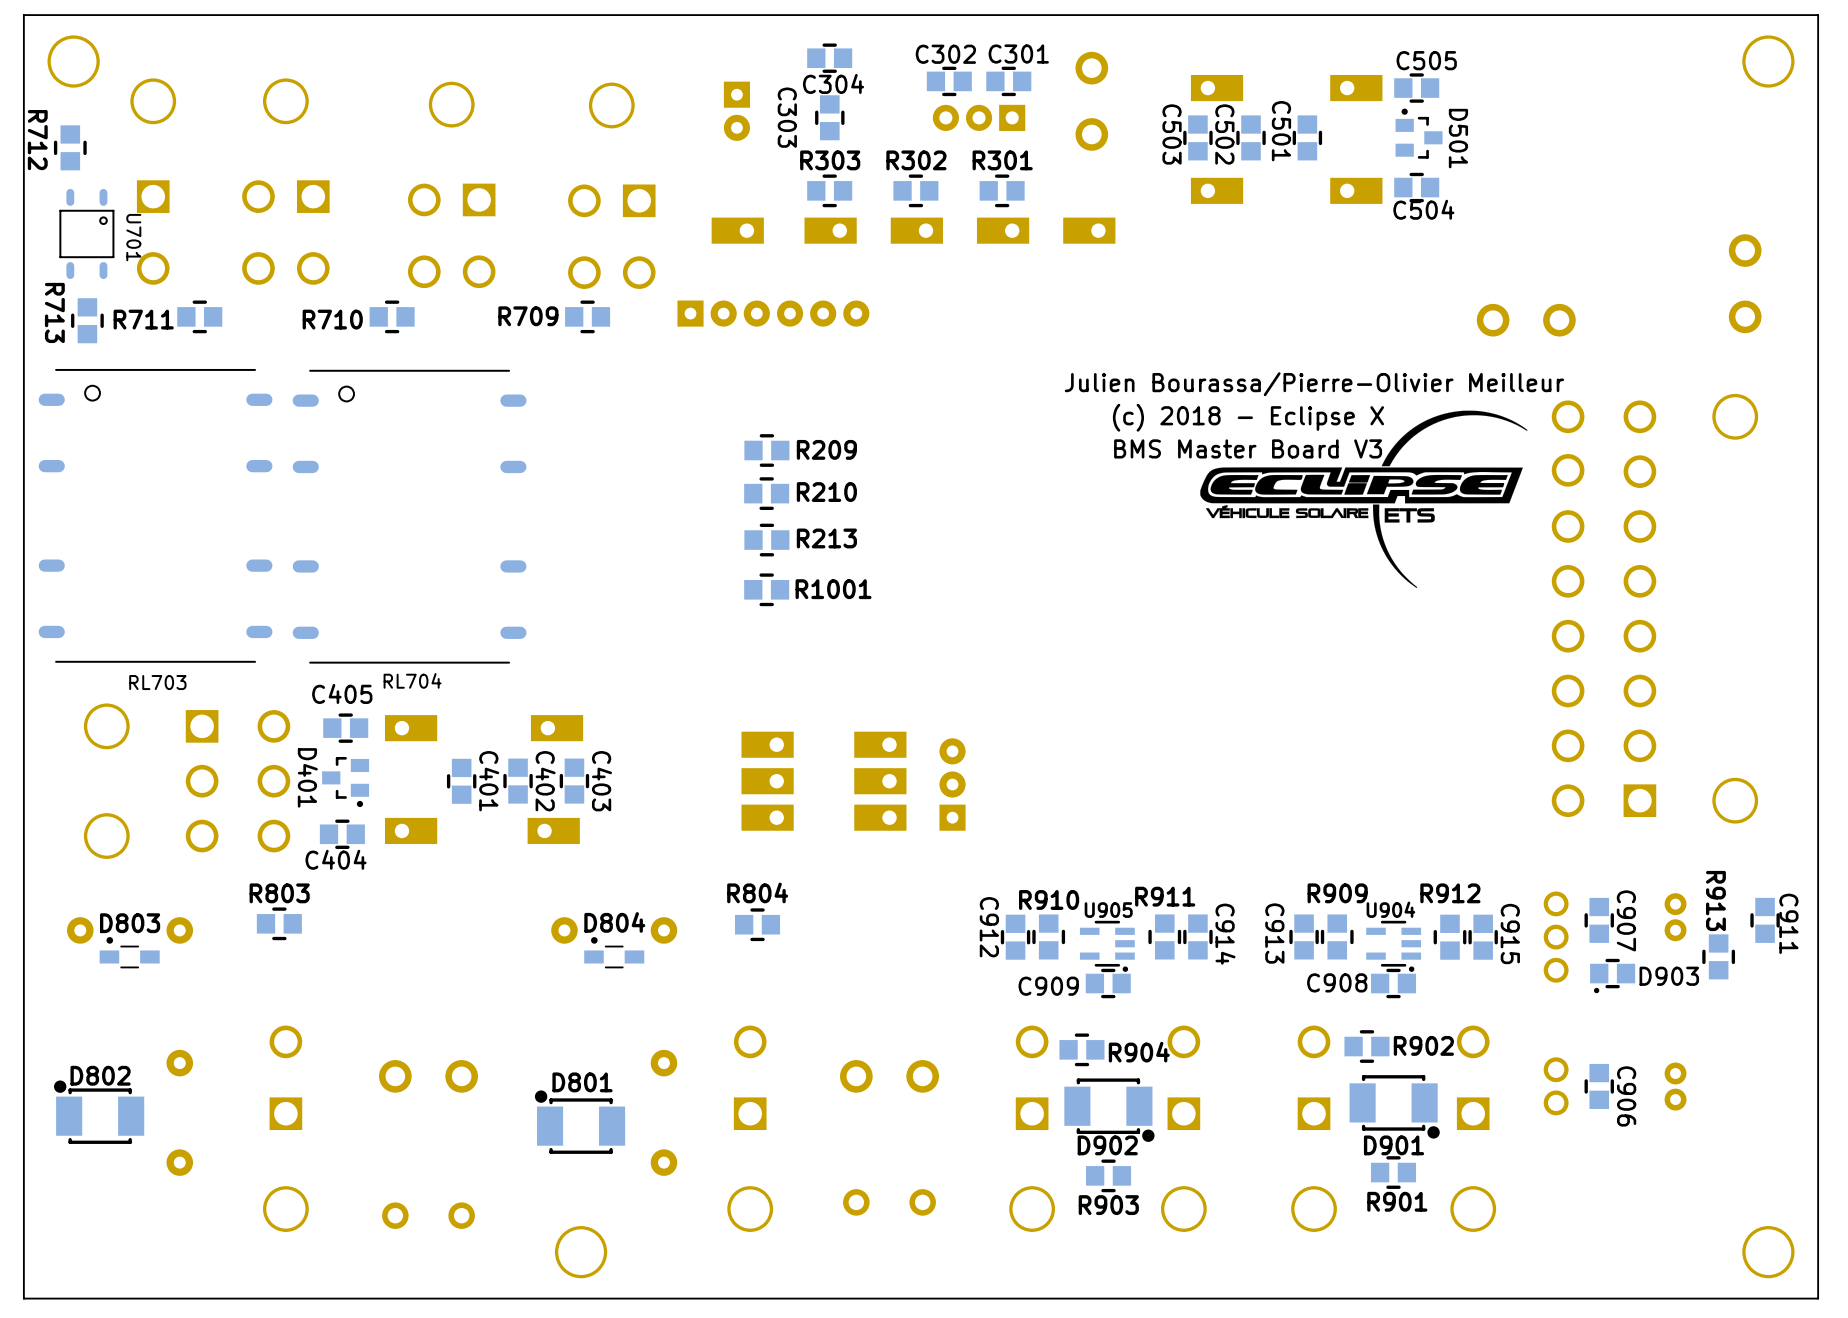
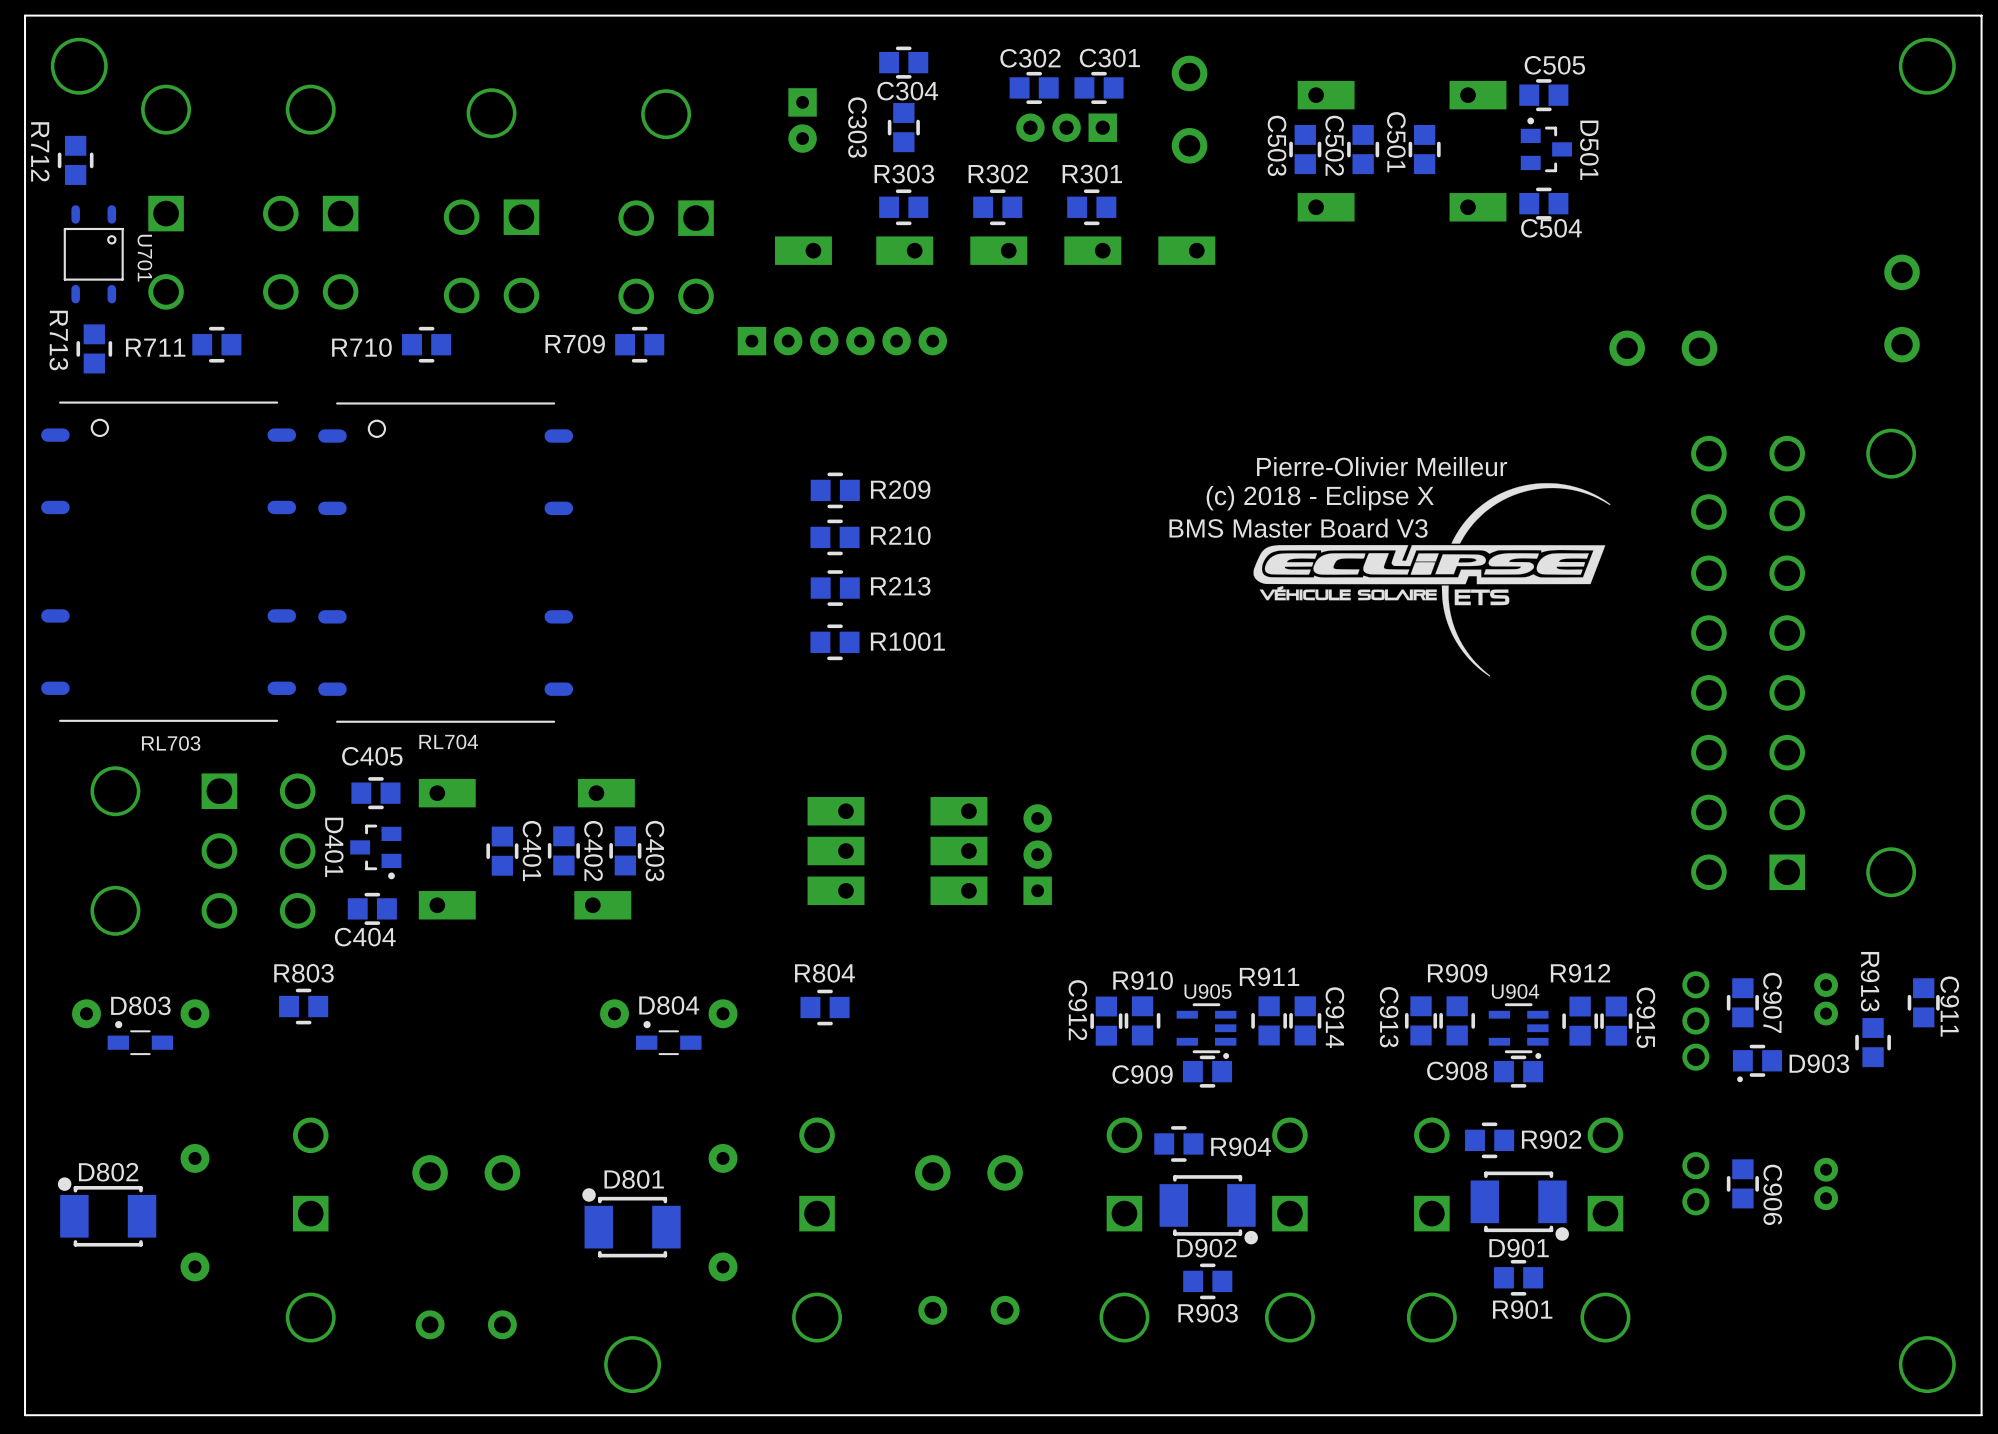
text: Julien Bourassa/Pierre-Olivier Meilleur (1314, 384) -> none
text position: (c) 2018 - Eclipse X (1248, 417) -> (c) 2018 - Eclipse X (1320, 498)
text: none -> Pierre-Olivier Meilleur (1382, 466)
text position: BMS Master Board V3 (1248, 448) -> BMS Master Board V3 (1298, 528)
drawing position: (1363, 499) -> (1431, 579)

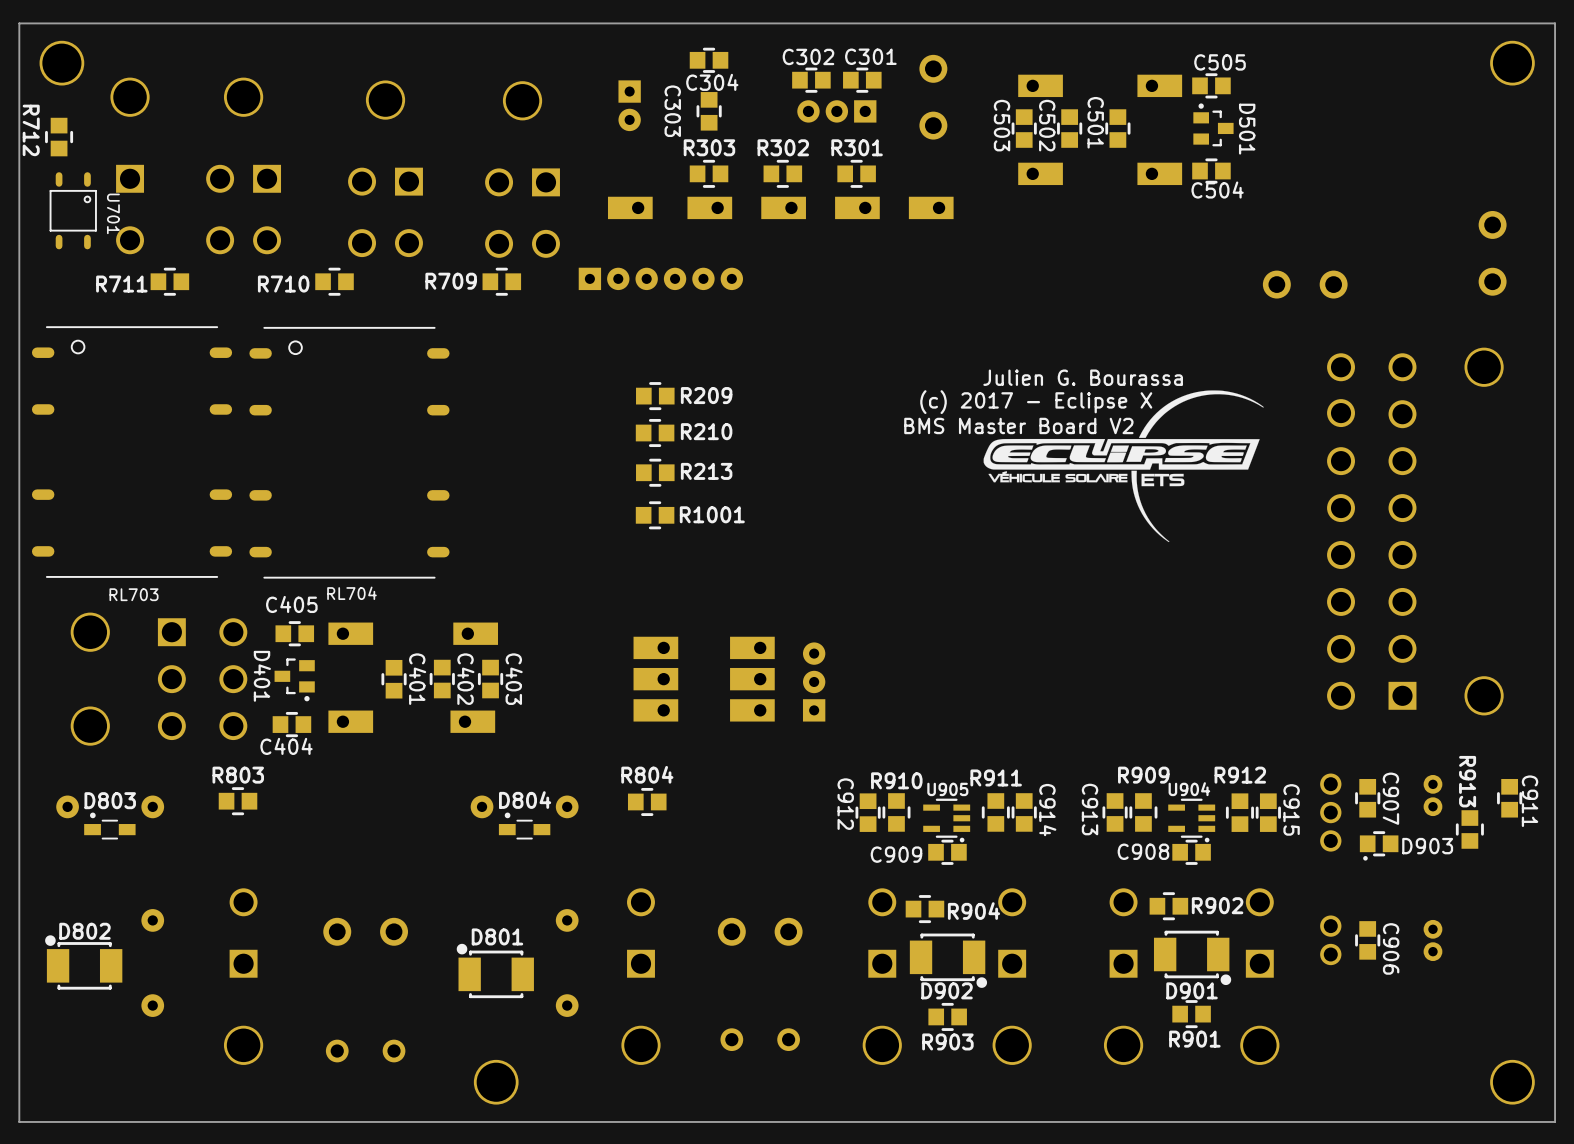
R713: (94, 348) -> none
text: Pierre-Olivier Meilleur (1382, 466) -> Julien G. Bourassa (1083, 377)
text: (c) 2018 - Eclipse X (1320, 498) -> (c) 2017 - Eclipse X (1036, 402)
text: BMS Master Board V3 (1298, 528) -> BMS Master Board V2 (1018, 425)

